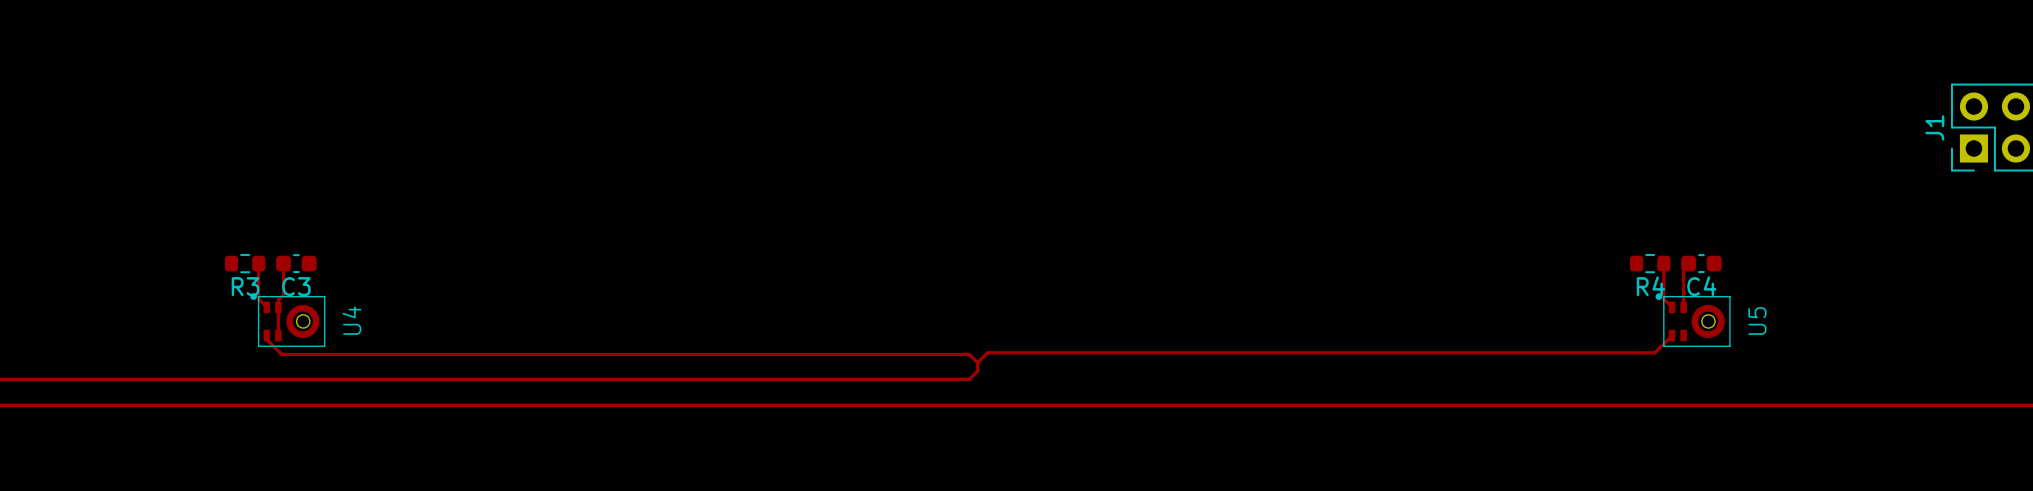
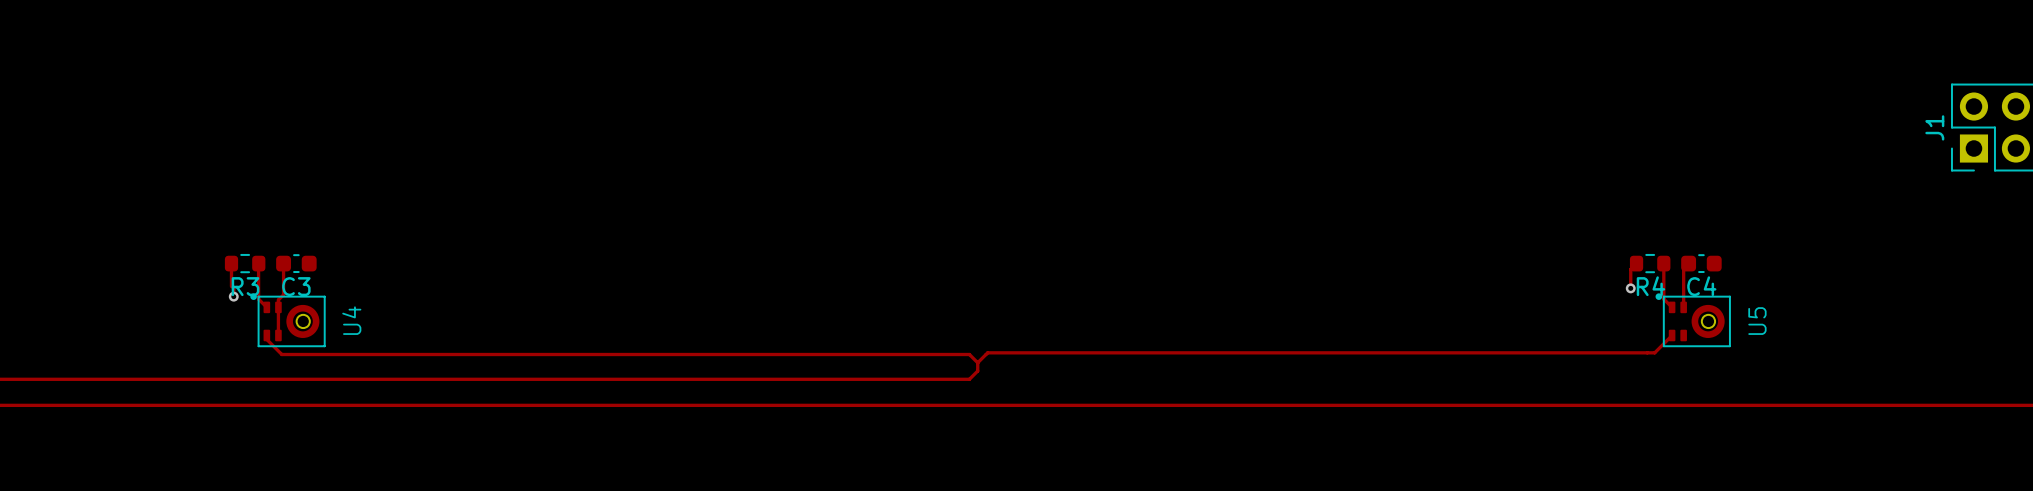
track: none -> (231, 263) (231, 286) (233, 288) (233, 296)
track: none -> (1636, 263) (1630, 269) (1630, 288)
via: none -> (1630, 288)
via: none -> (233, 296)

